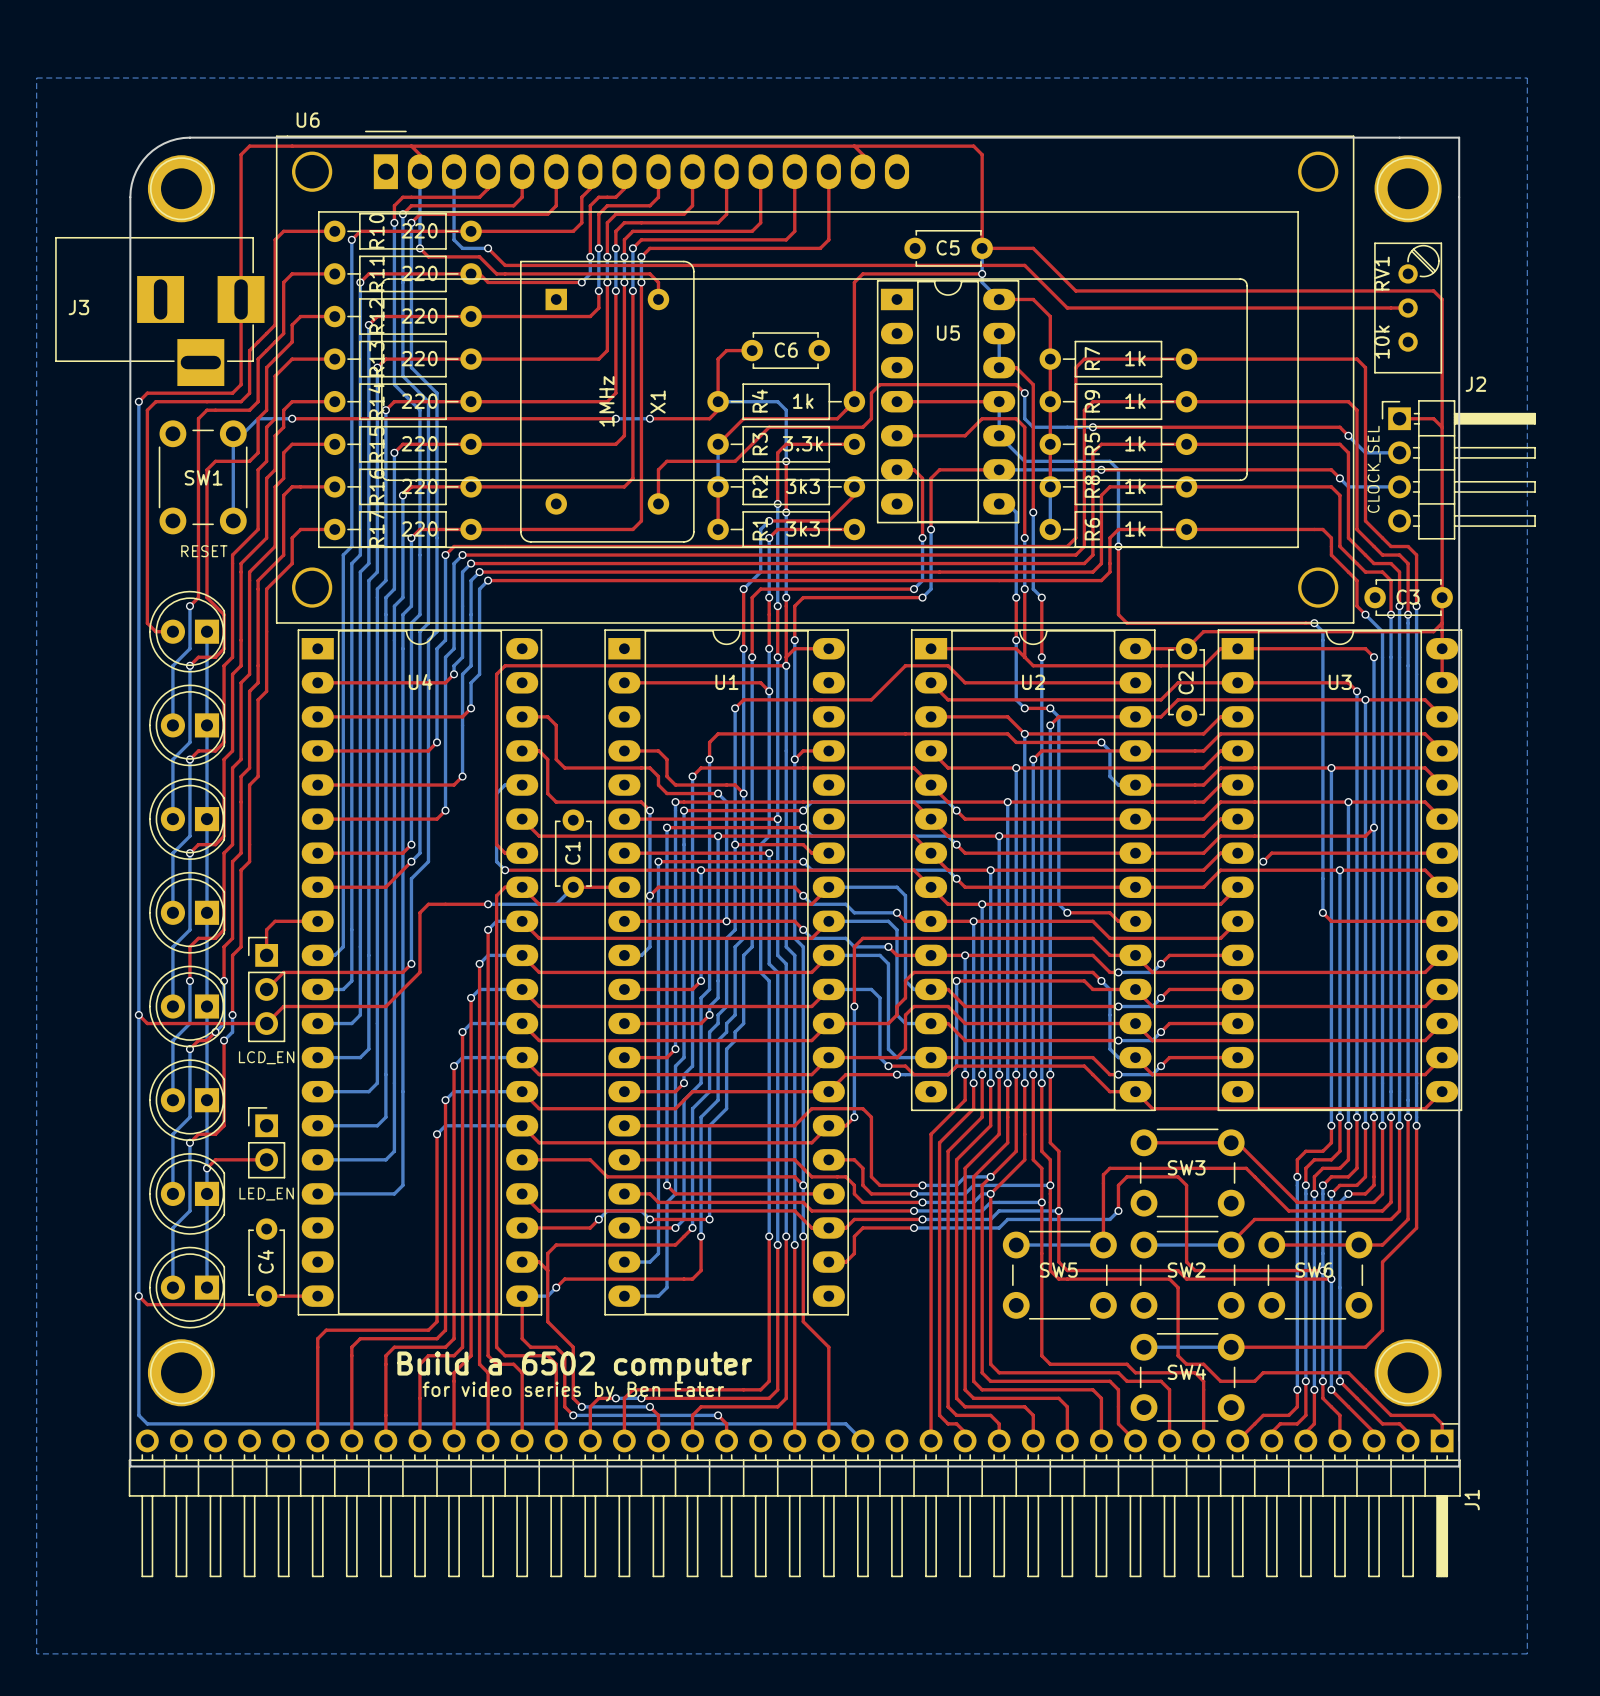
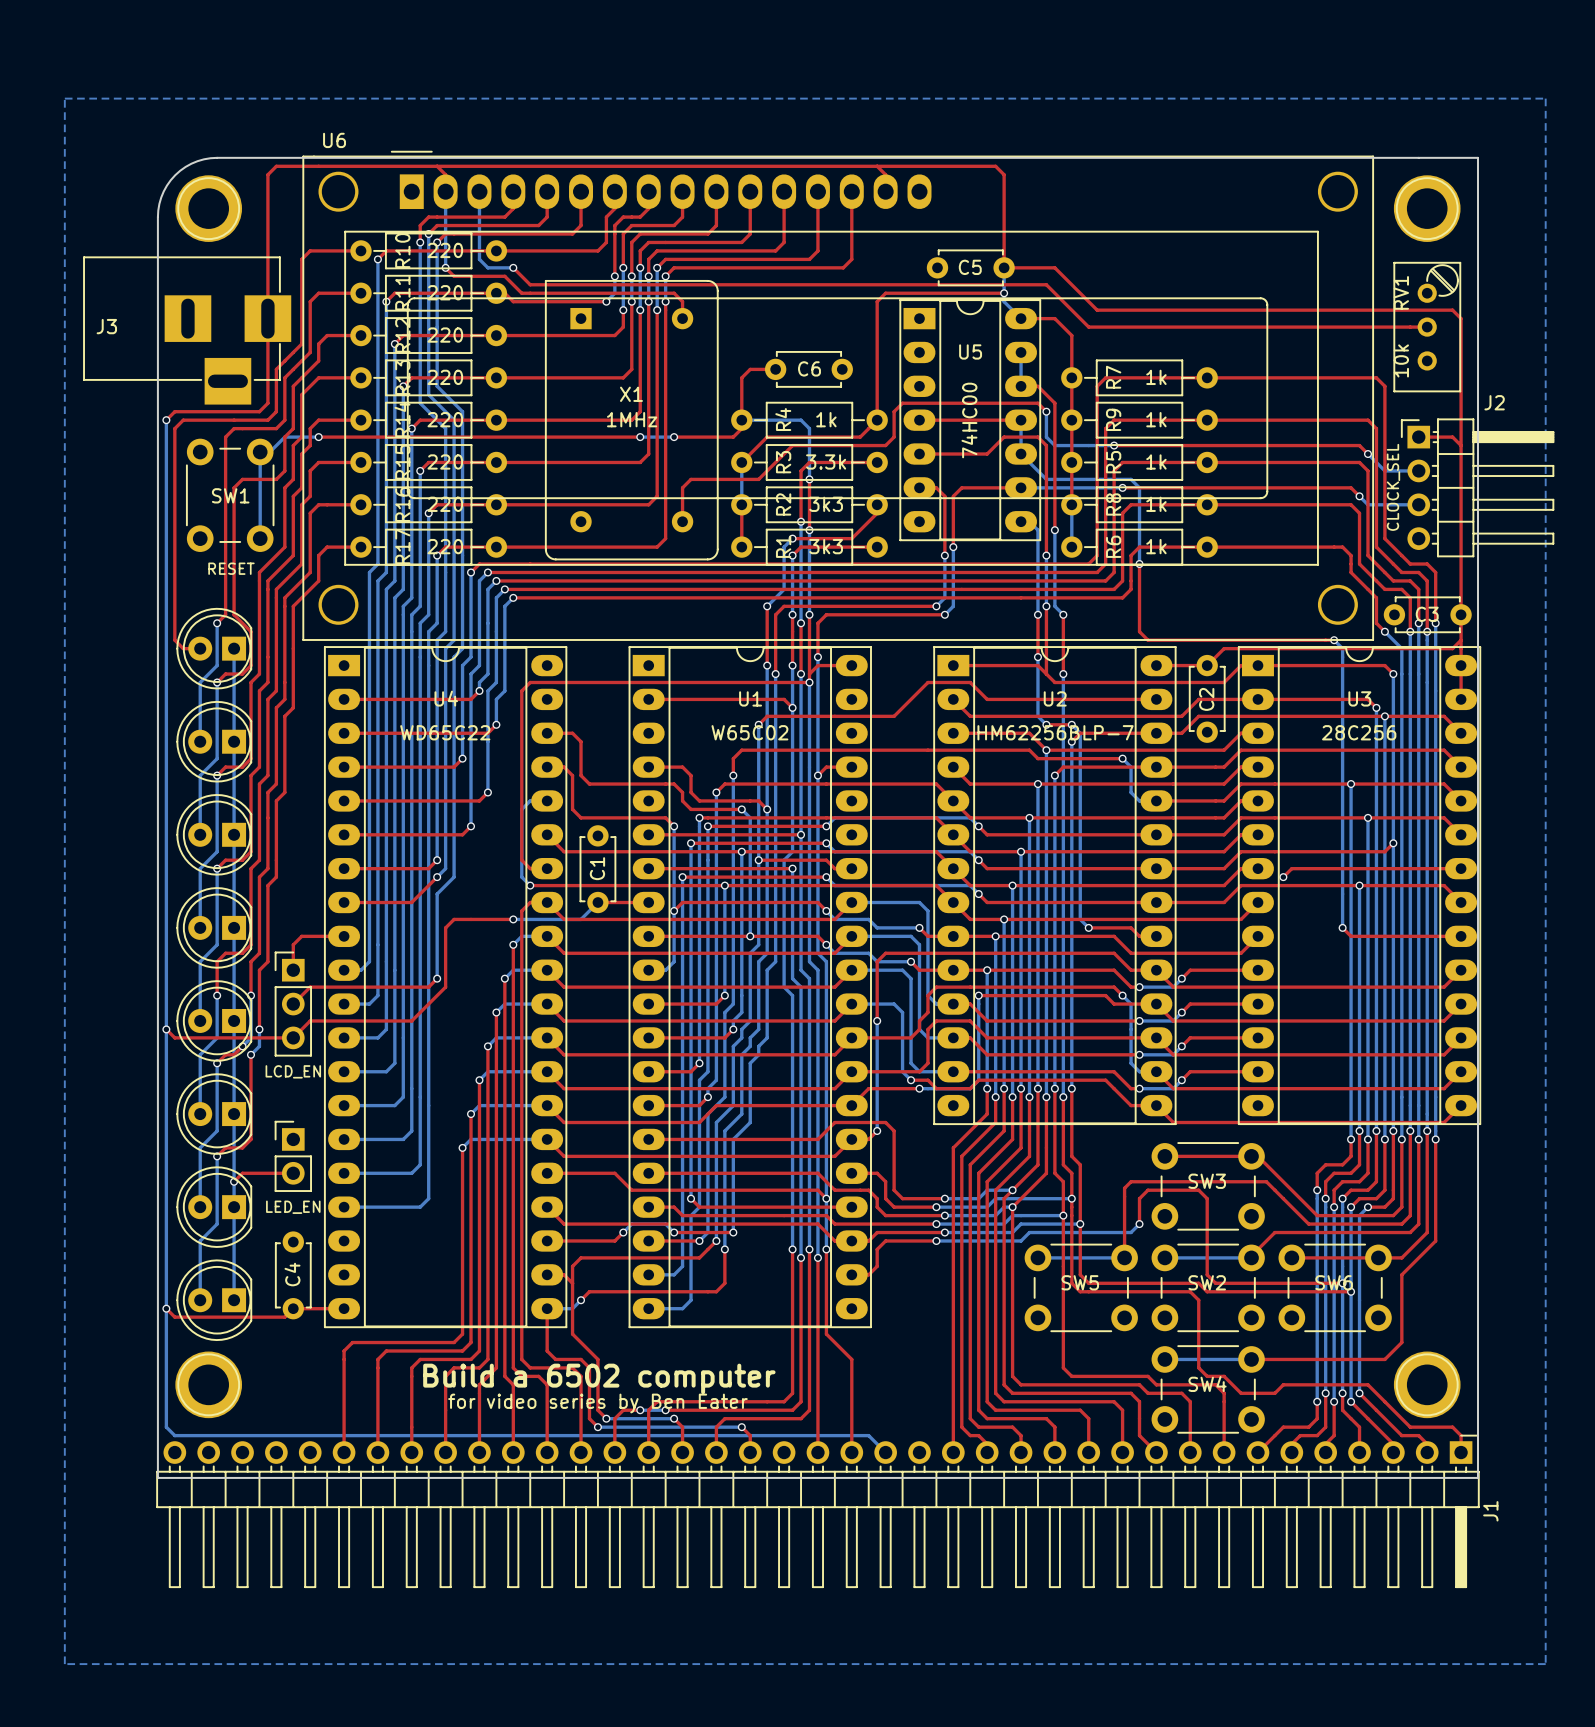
X1 value rotation: 0° (606, 401) -> 90° clockwise (632, 419)
X1 name rotation: 0° (657, 402) -> 90° clockwise (631, 394)
X1 name position: X1 (657, 402) -> X1 (631, 394)
U5 value: none -> 74HC00 (969, 420)
U4 value: none -> WD65C22 (445, 732)
U1 value: none -> W65C02 (749, 732)
U2 value: none -> HM62256BLP-7 (1055, 732)
U3 value: none -> 28C256 (1359, 732)

